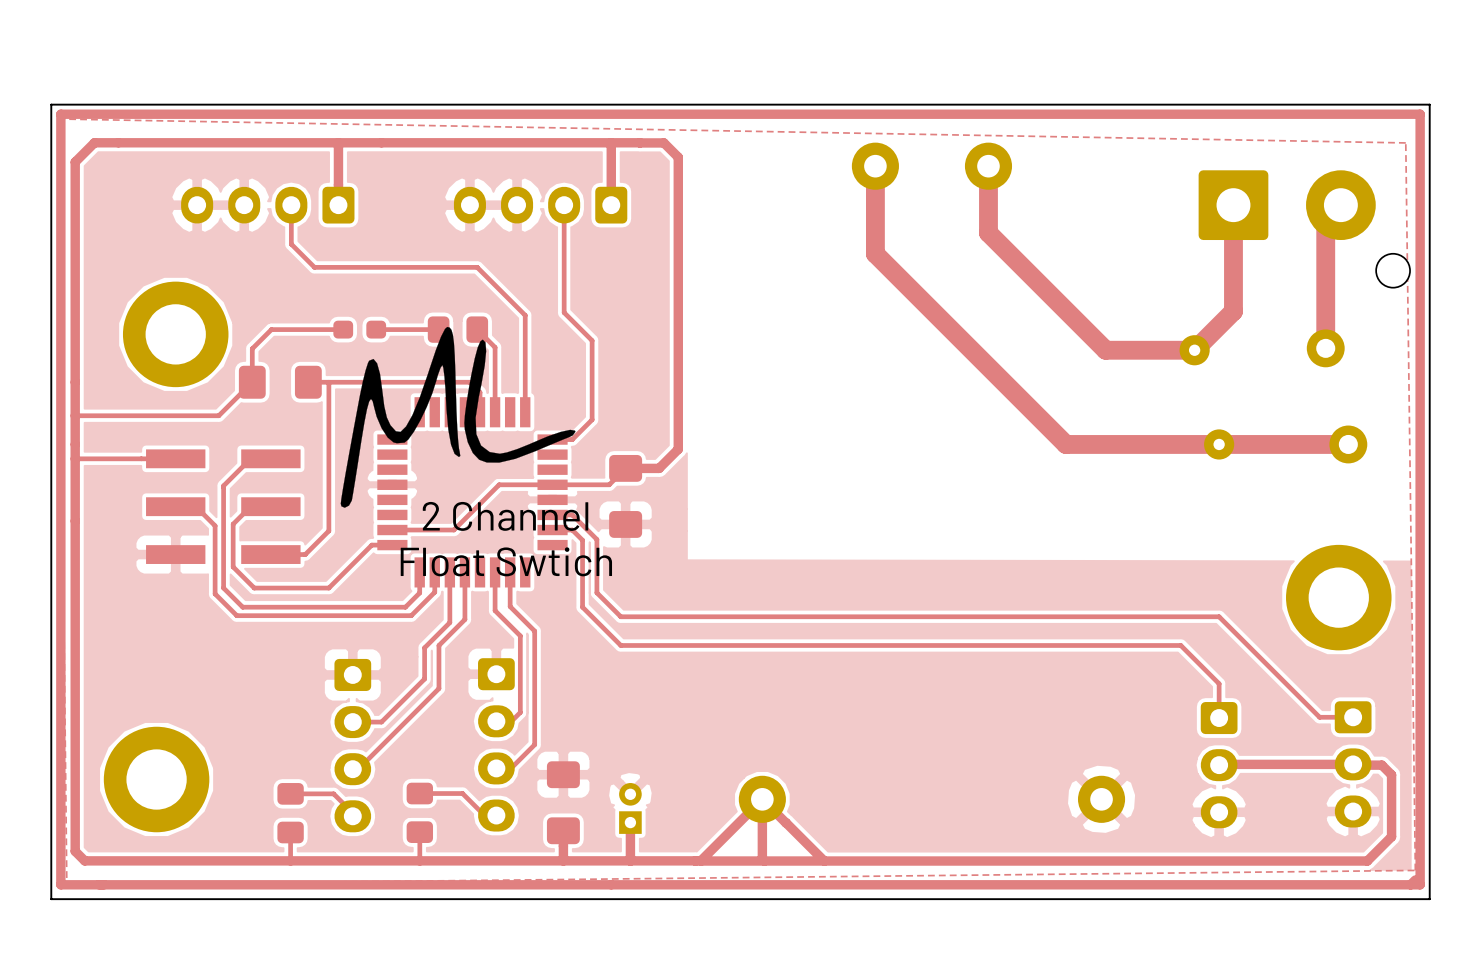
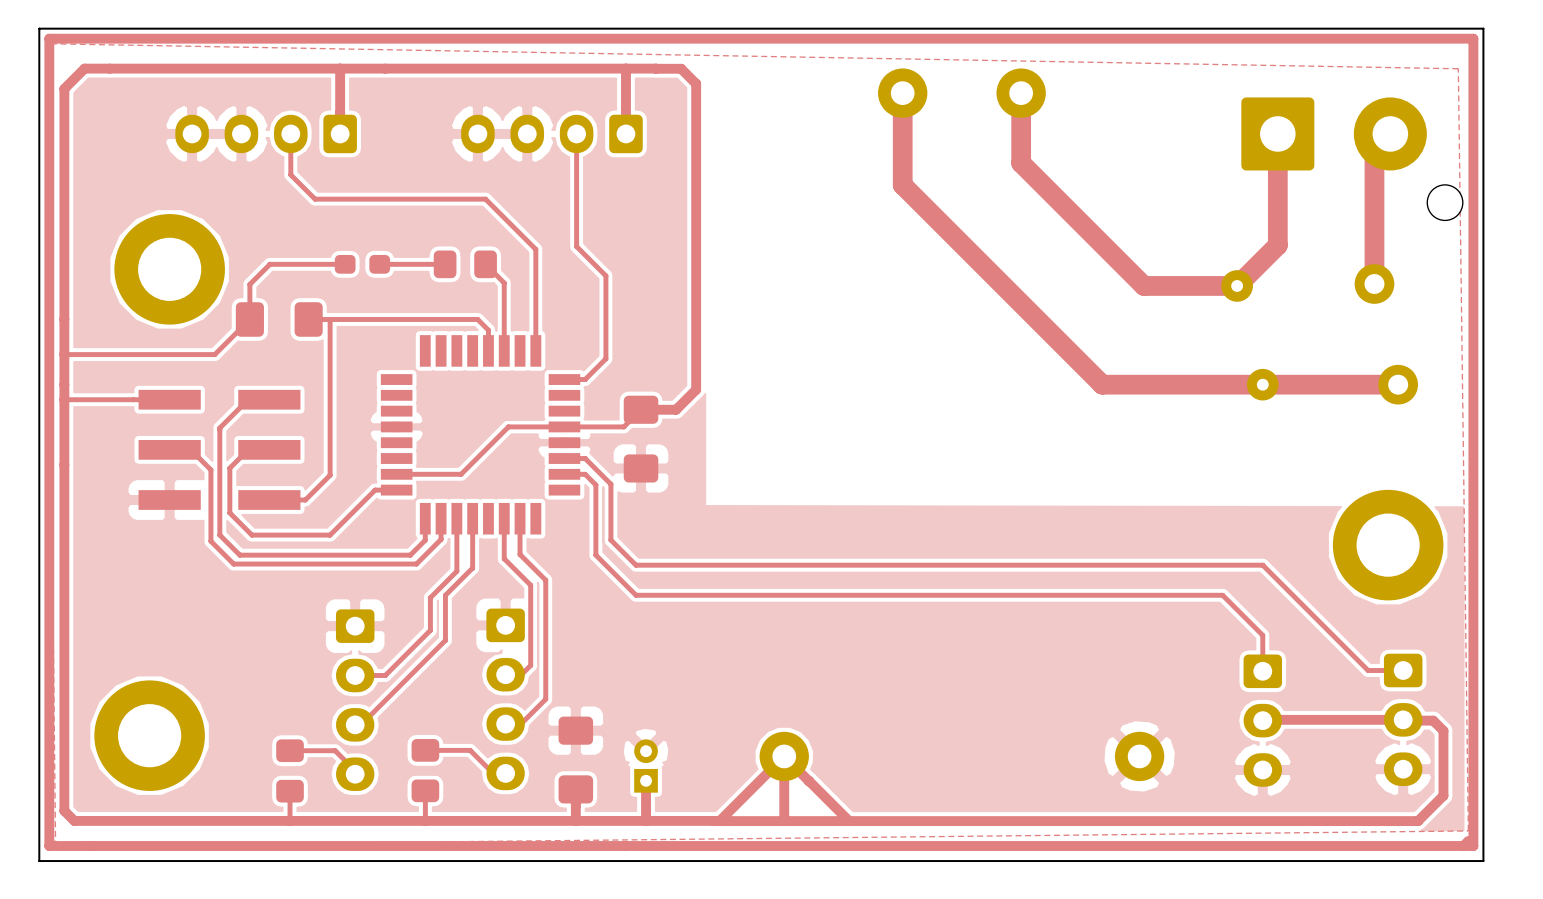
drawing: [340, 326, 576, 508] -> none
text: 2 Channel (505, 516) -> none
text: Float Swtich (506, 561) -> none

